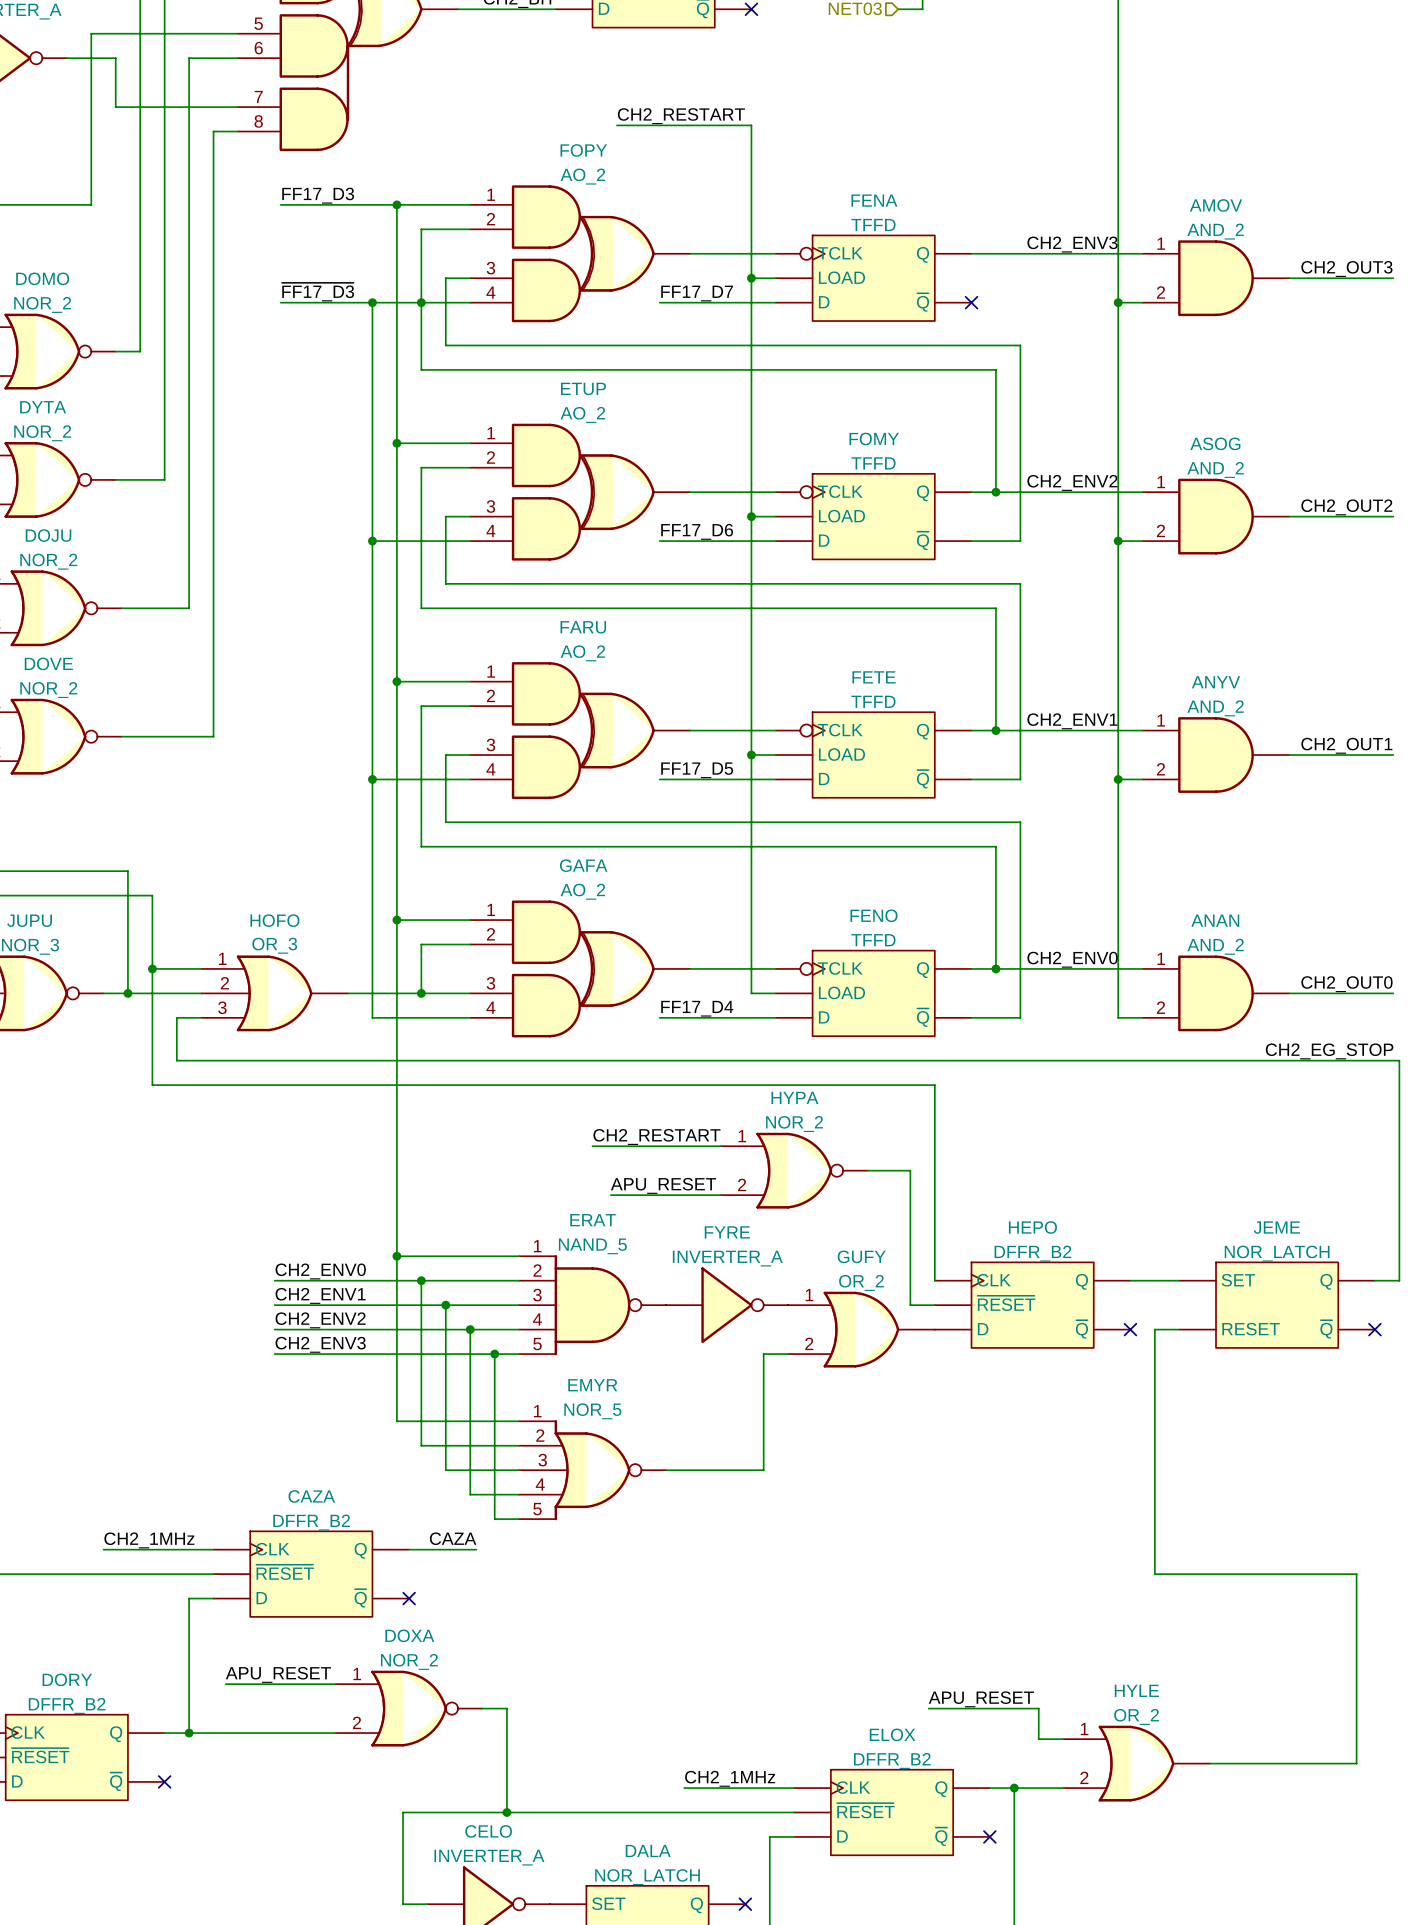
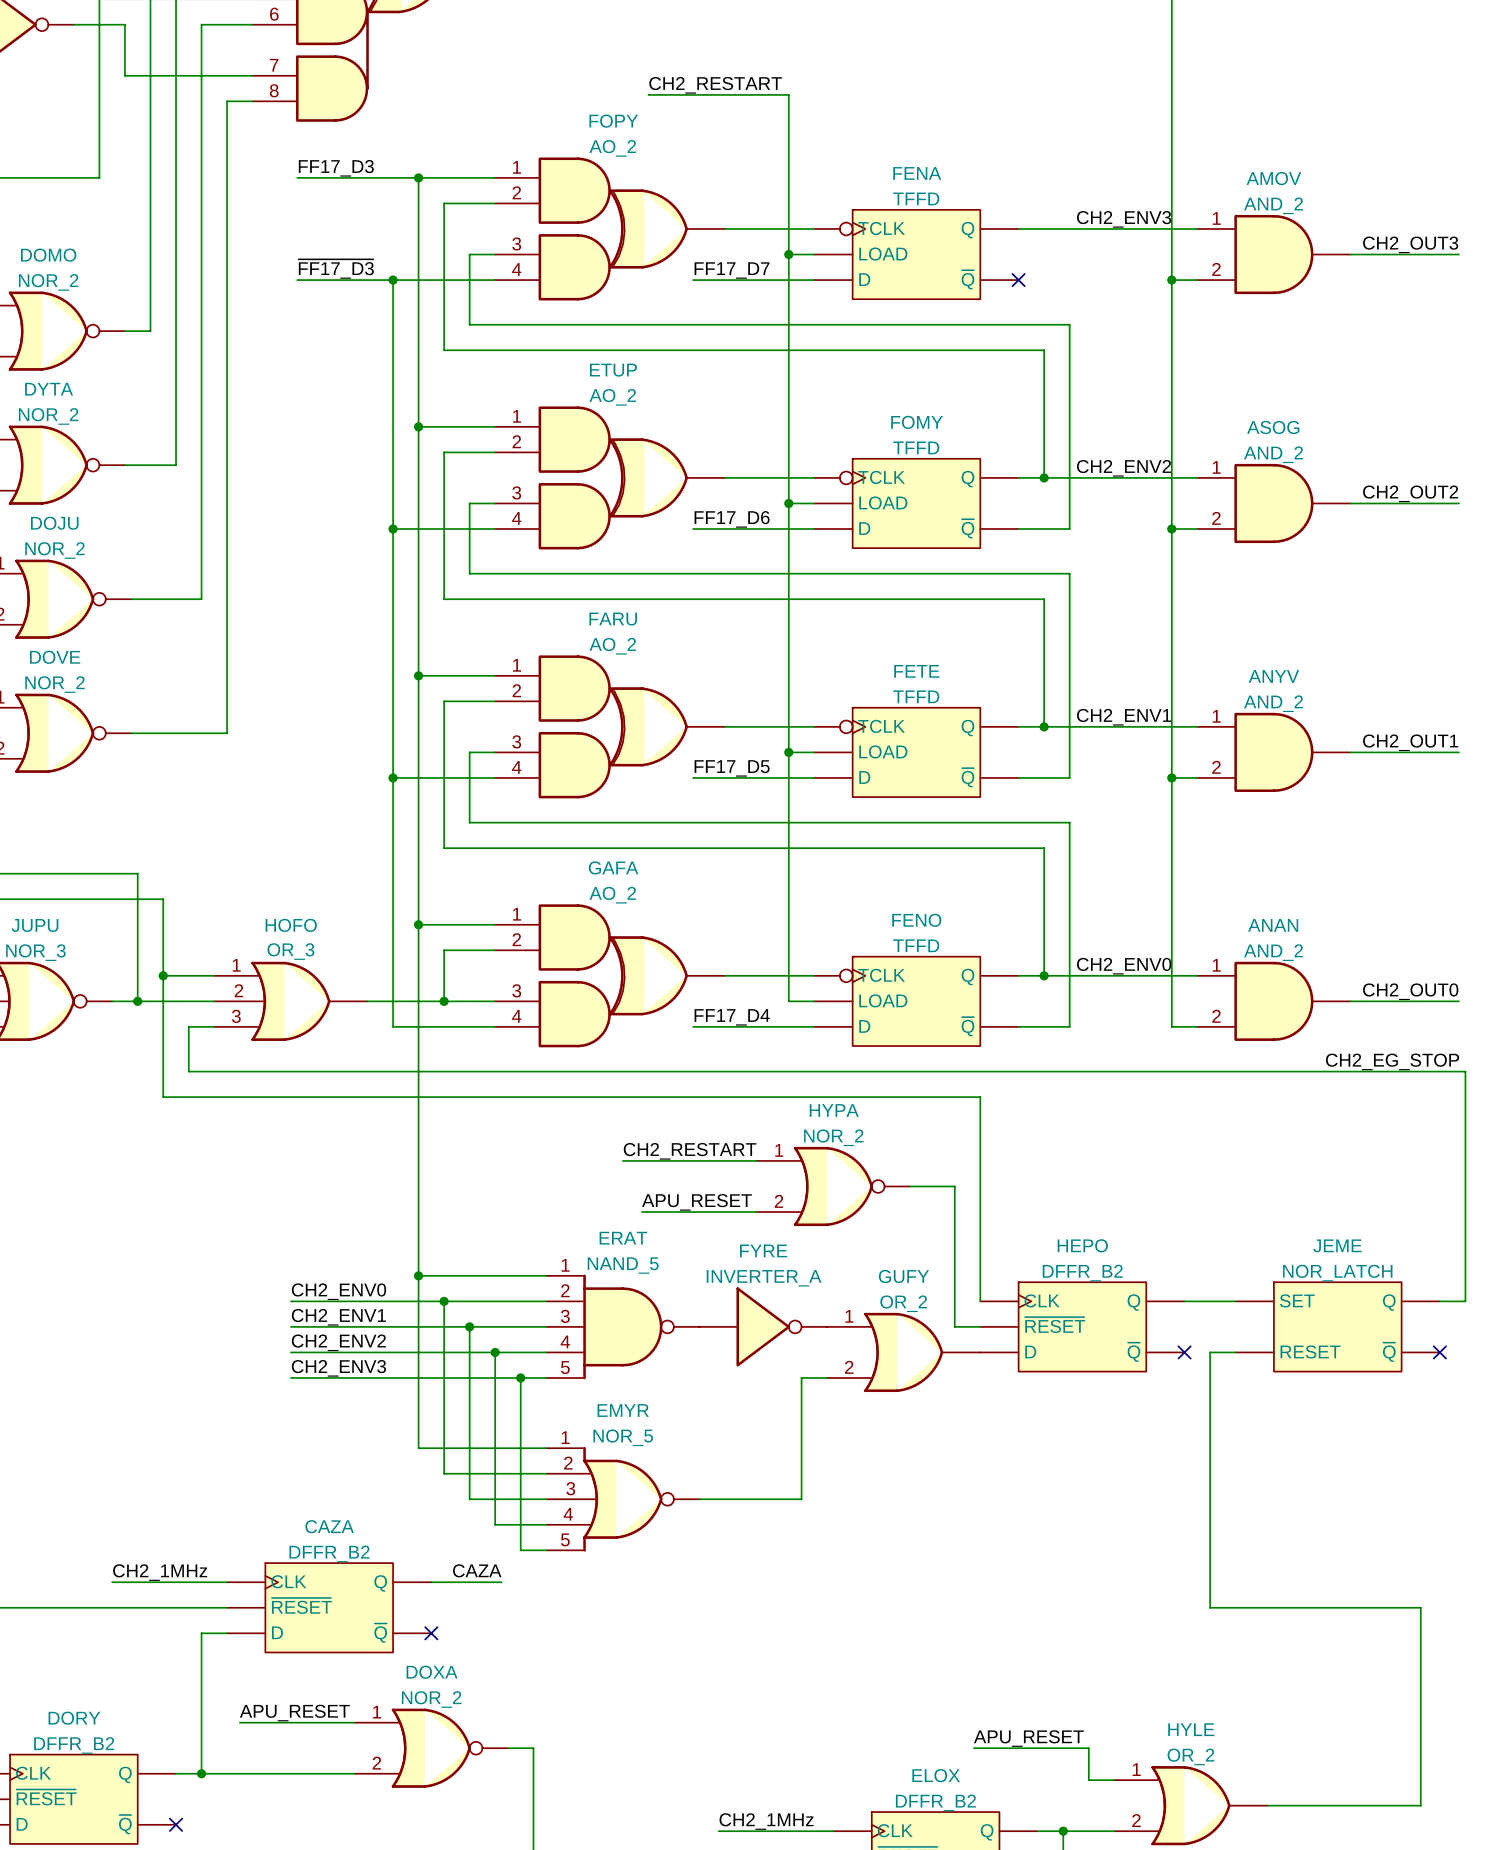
junction: (421, 302) -> none

